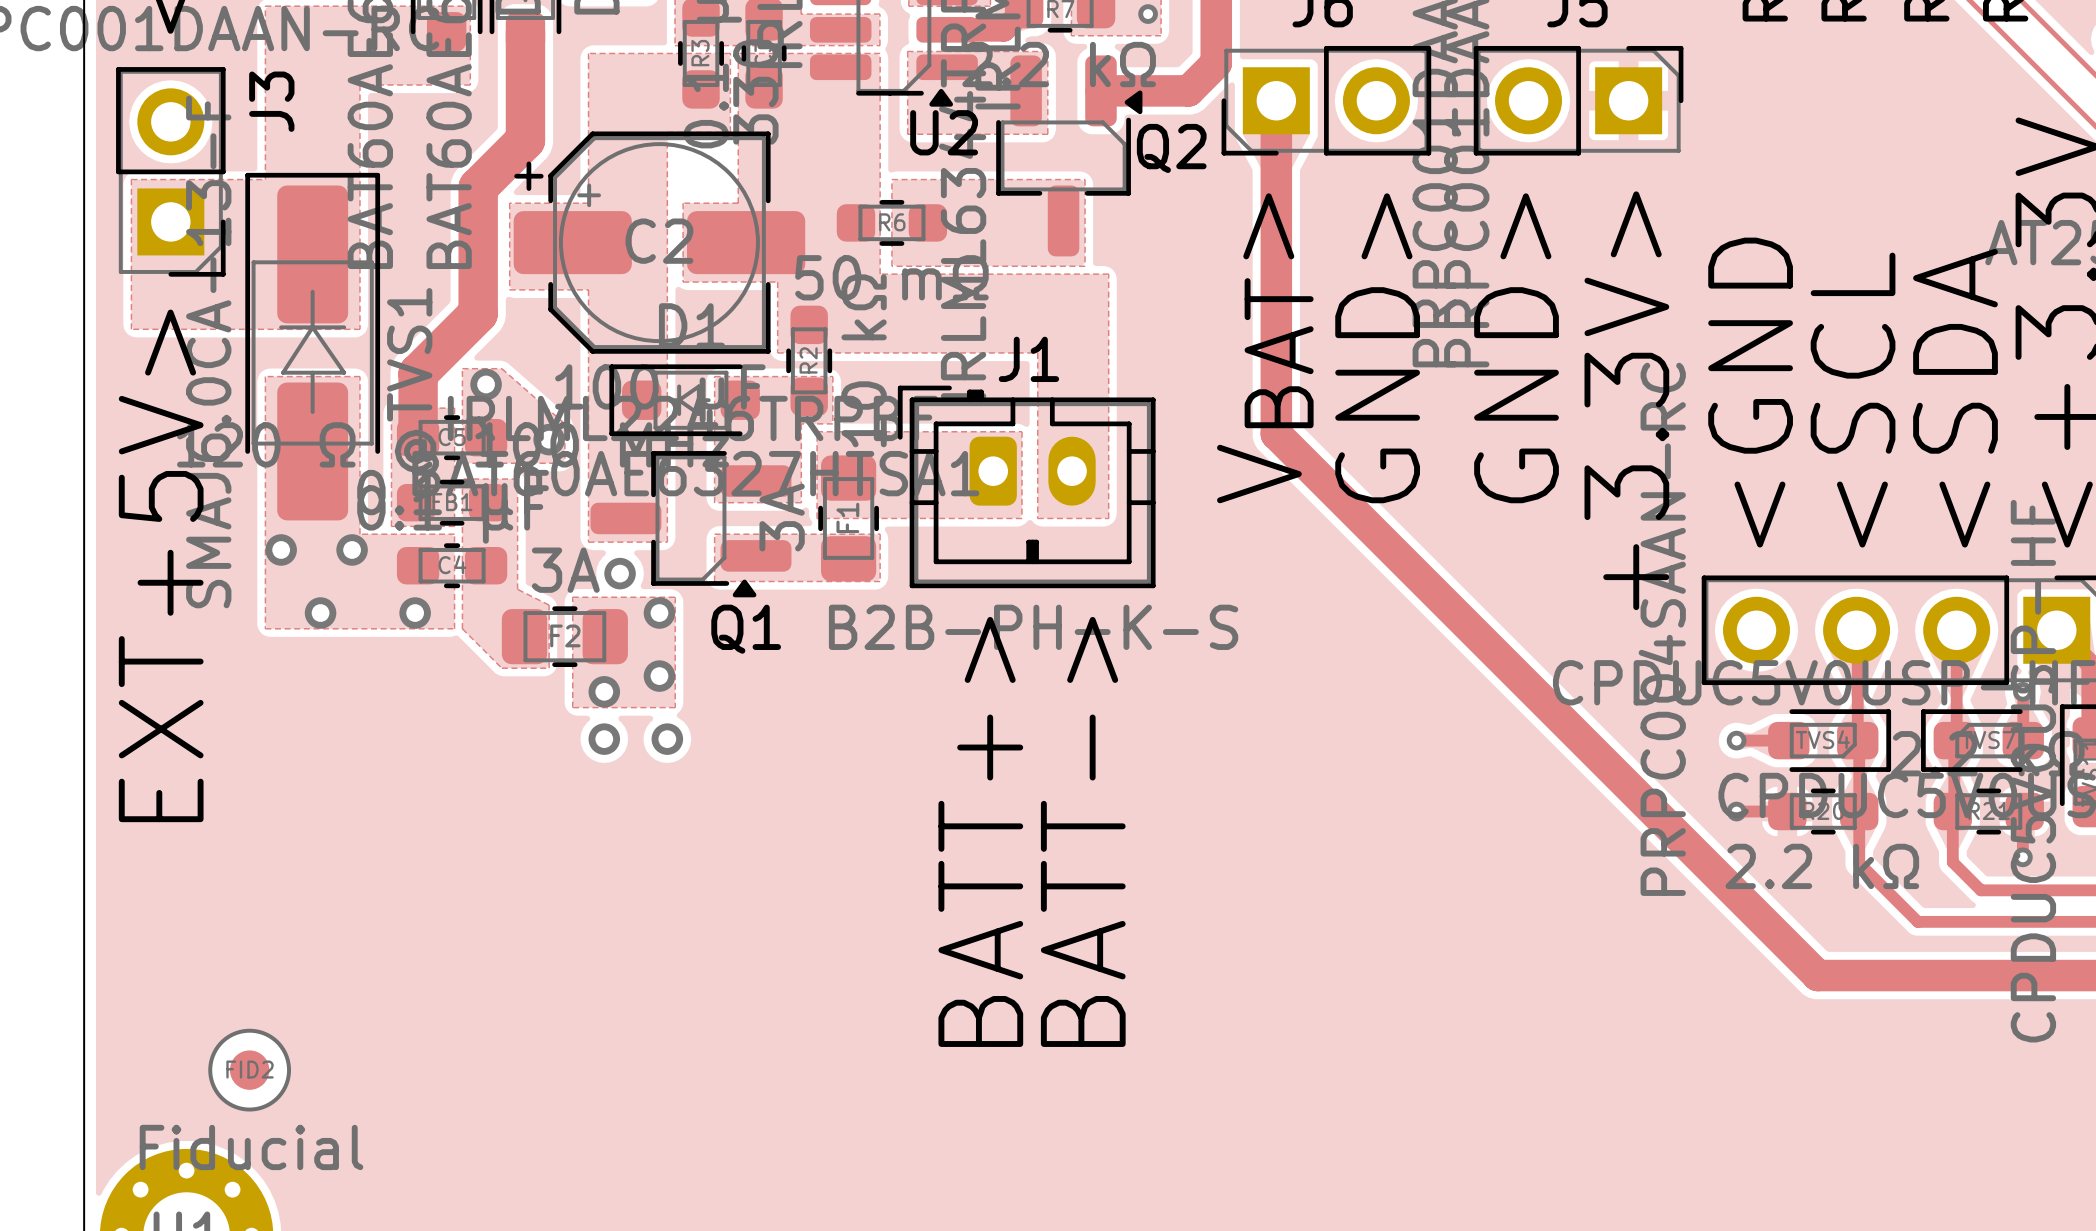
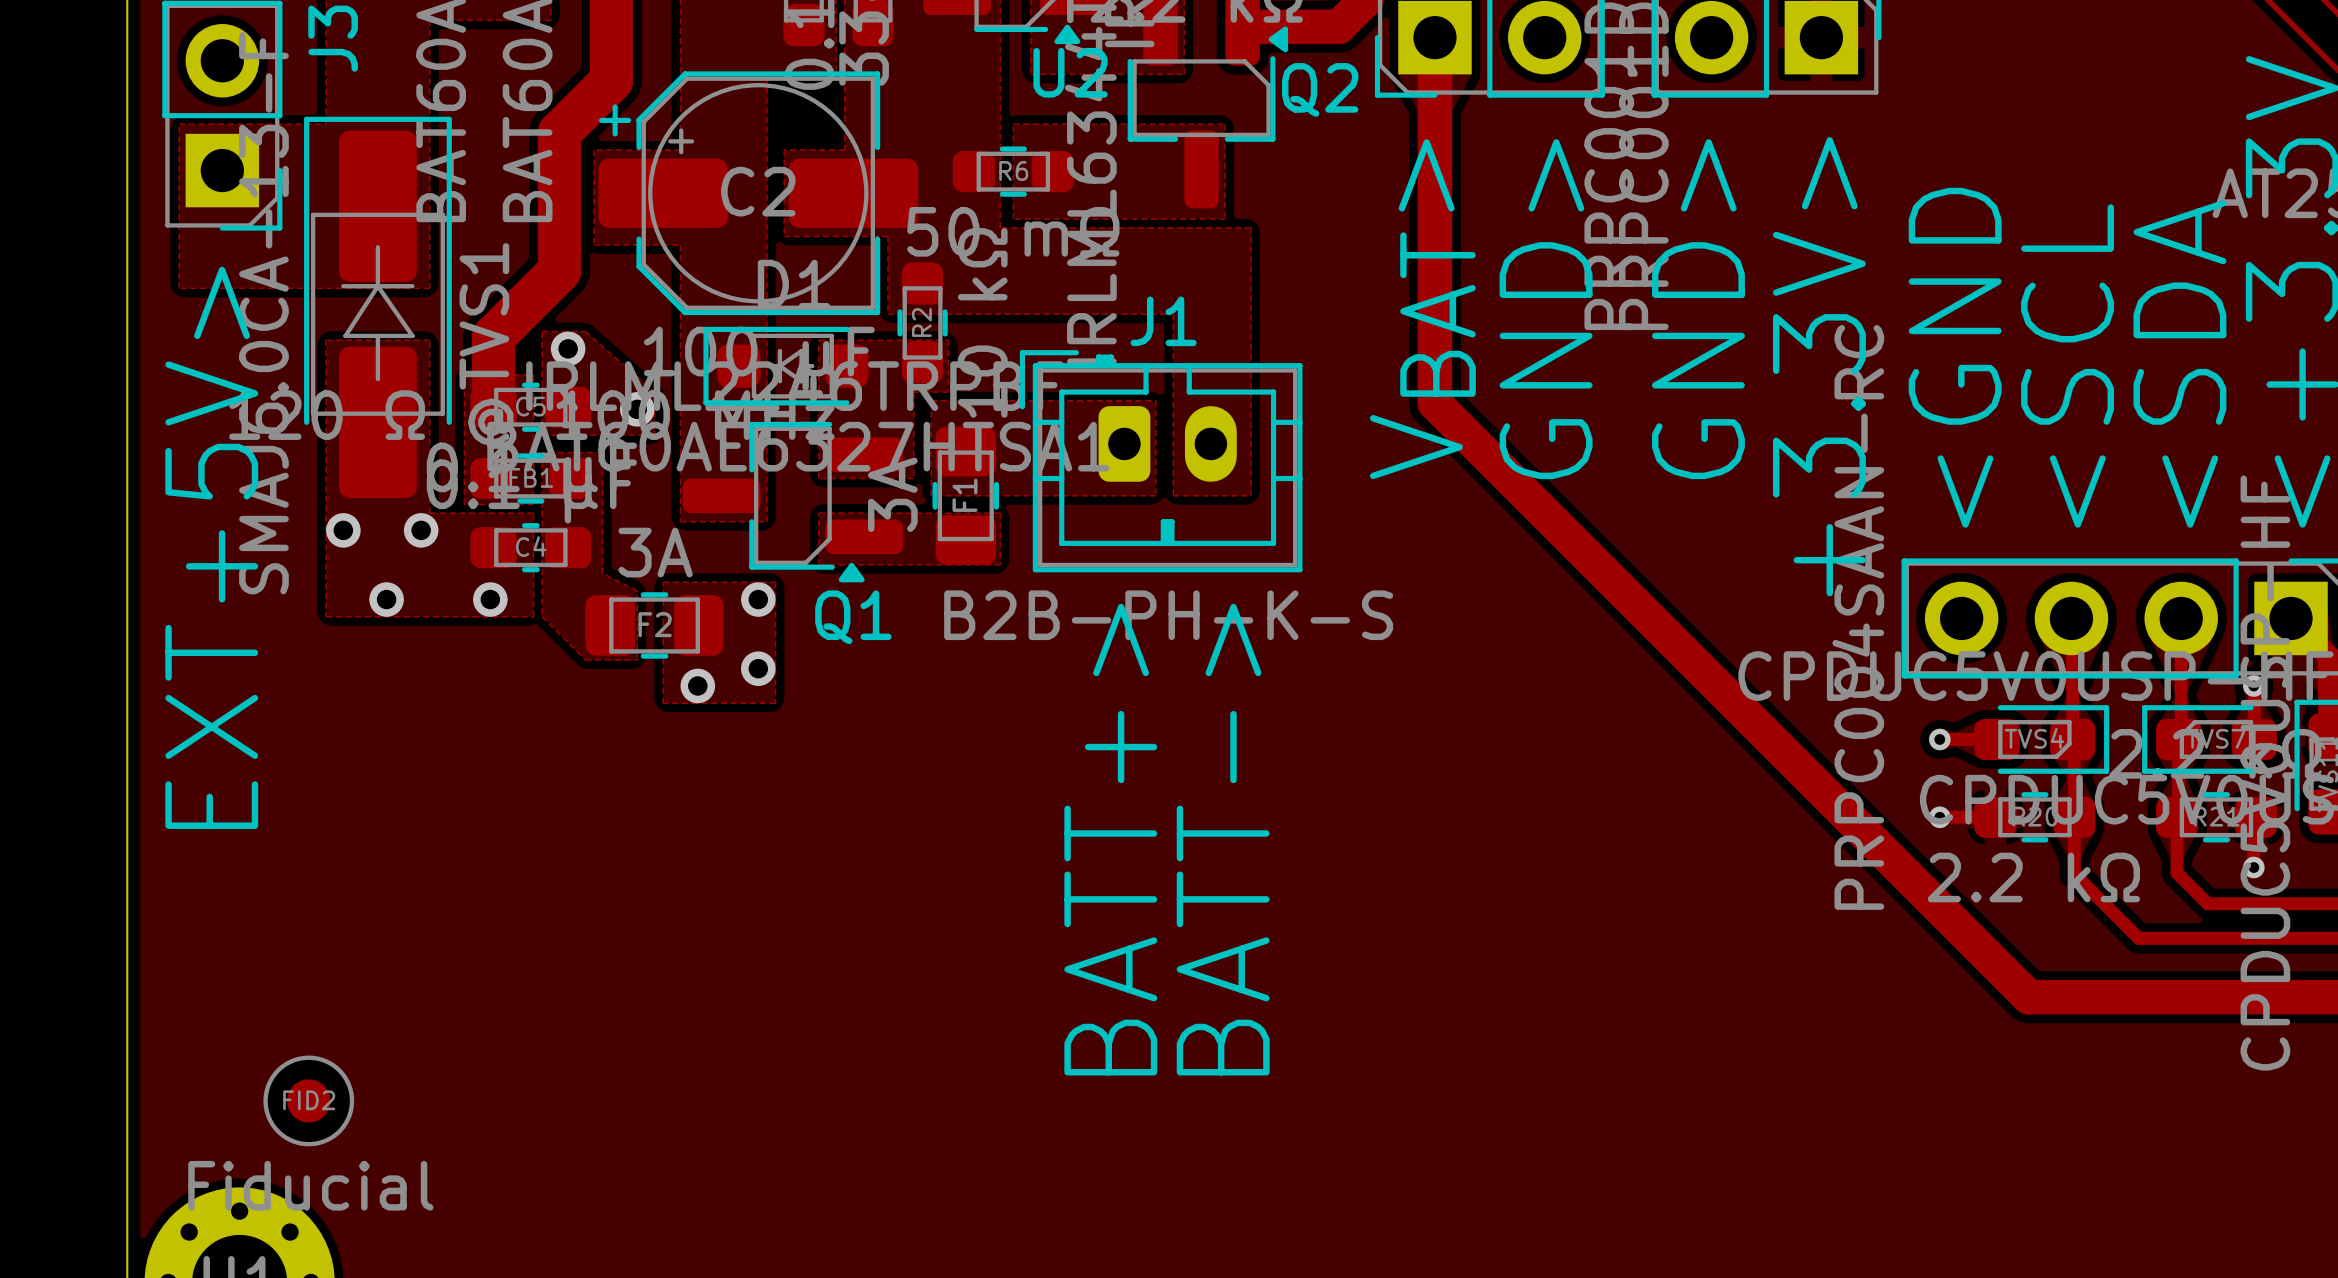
via: (620, 573) -> none
via: (604, 739) -> none
via: (667, 739) -> none

